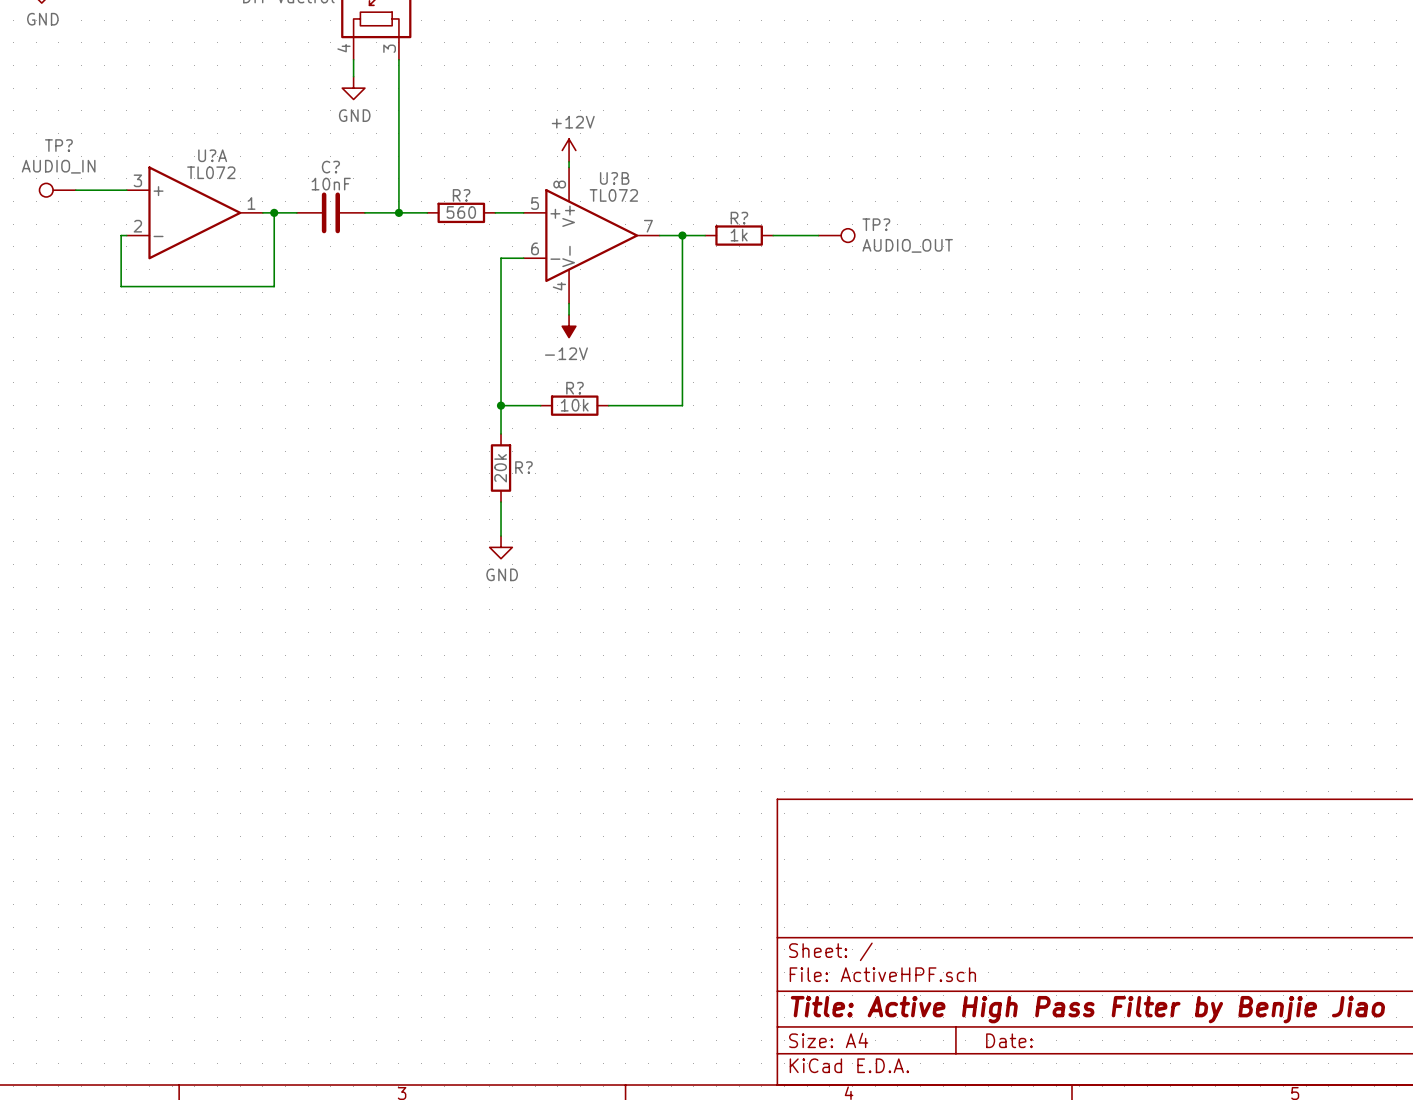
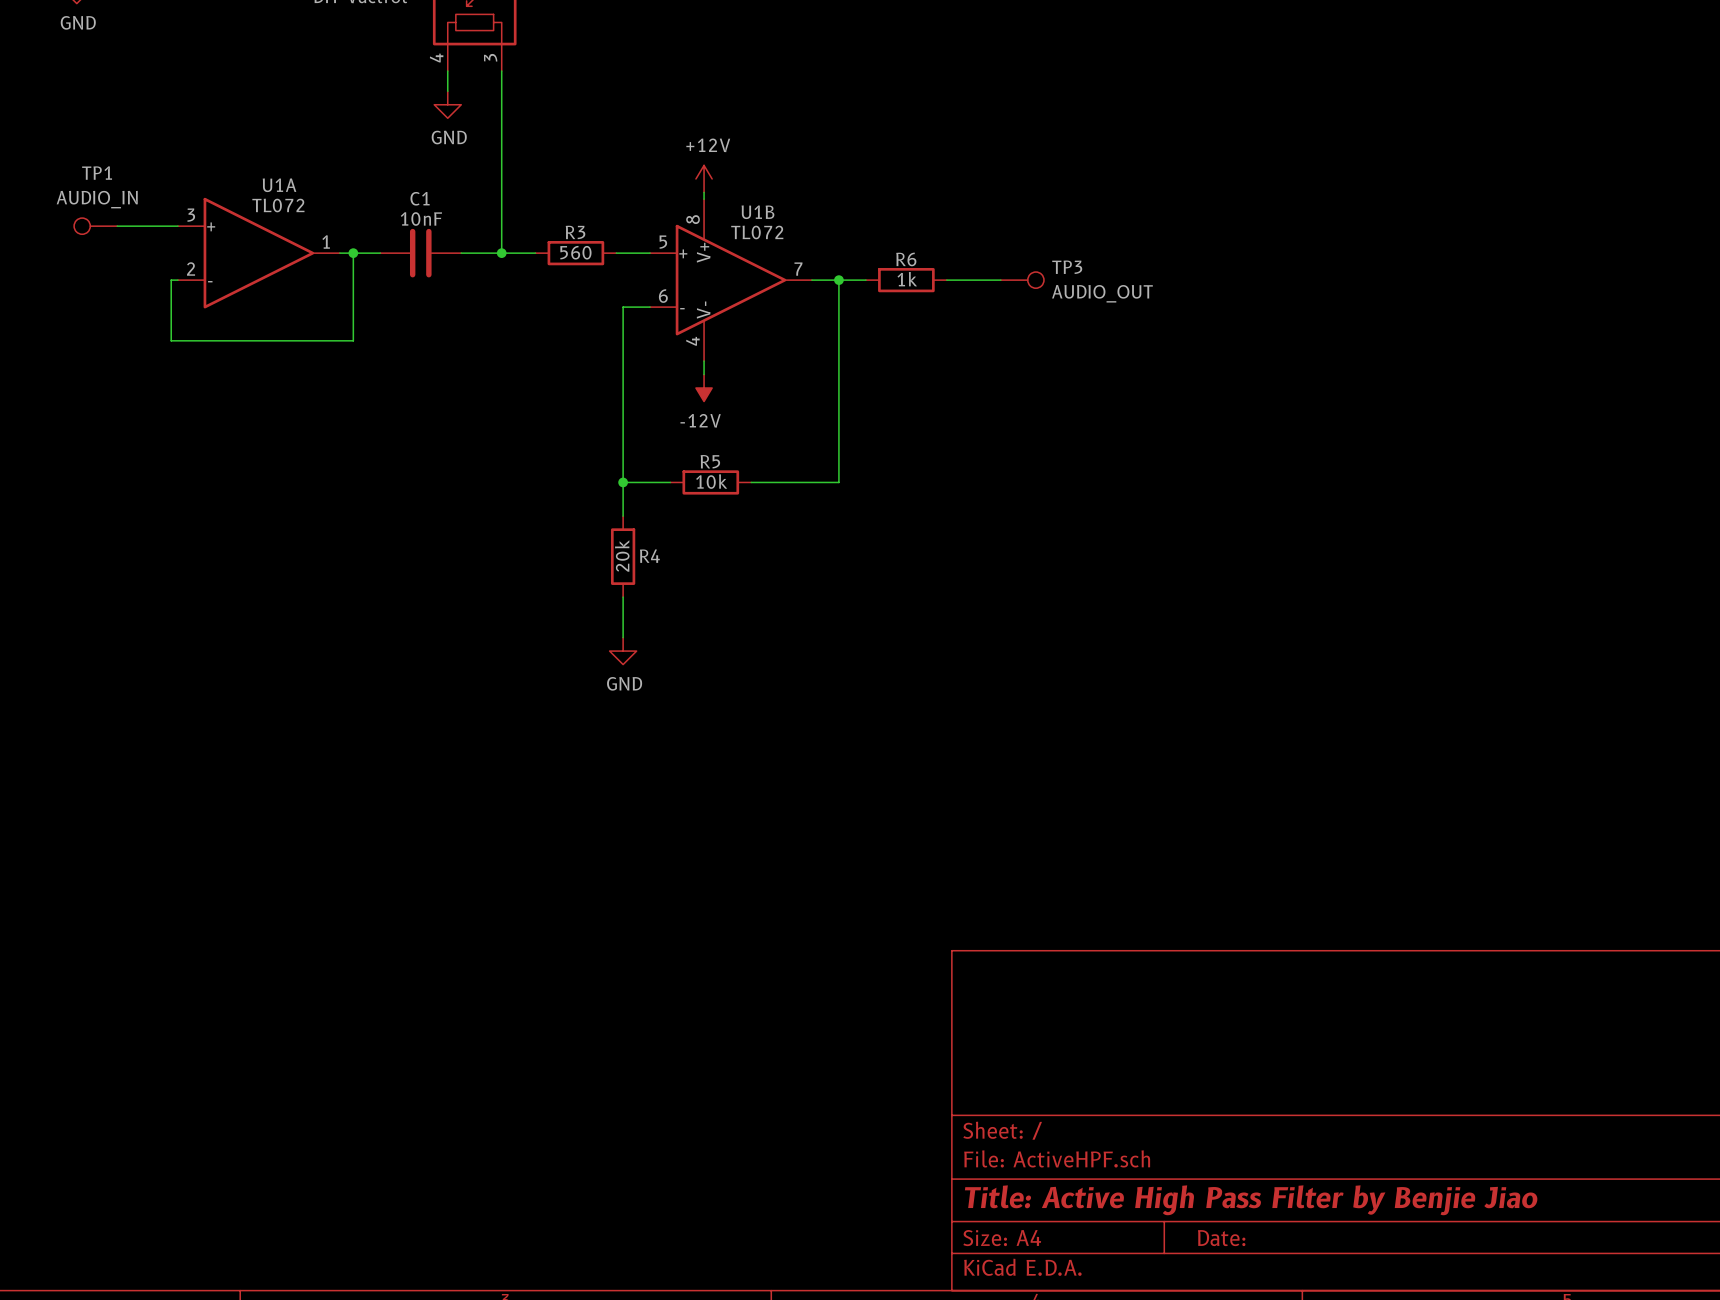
TP? name: TP? (58, 145) -> TP1 (97, 173)
U?A name: U?A (212, 155) -> U1A (279, 185)
C? name: C? (330, 167) -> C1 (420, 198)
U?B name: U?B (614, 178) -> U1B (757, 212)
R? name: R? (461, 195) -> R3 (575, 232)
R? name: R? (739, 218) -> R6 (906, 259)
TP? name: TP? (876, 224) -> TP3 (1067, 267)
R? name: R? (574, 388) -> R5 (710, 461)
R? name: R? (523, 467) -> R4 (649, 556)

